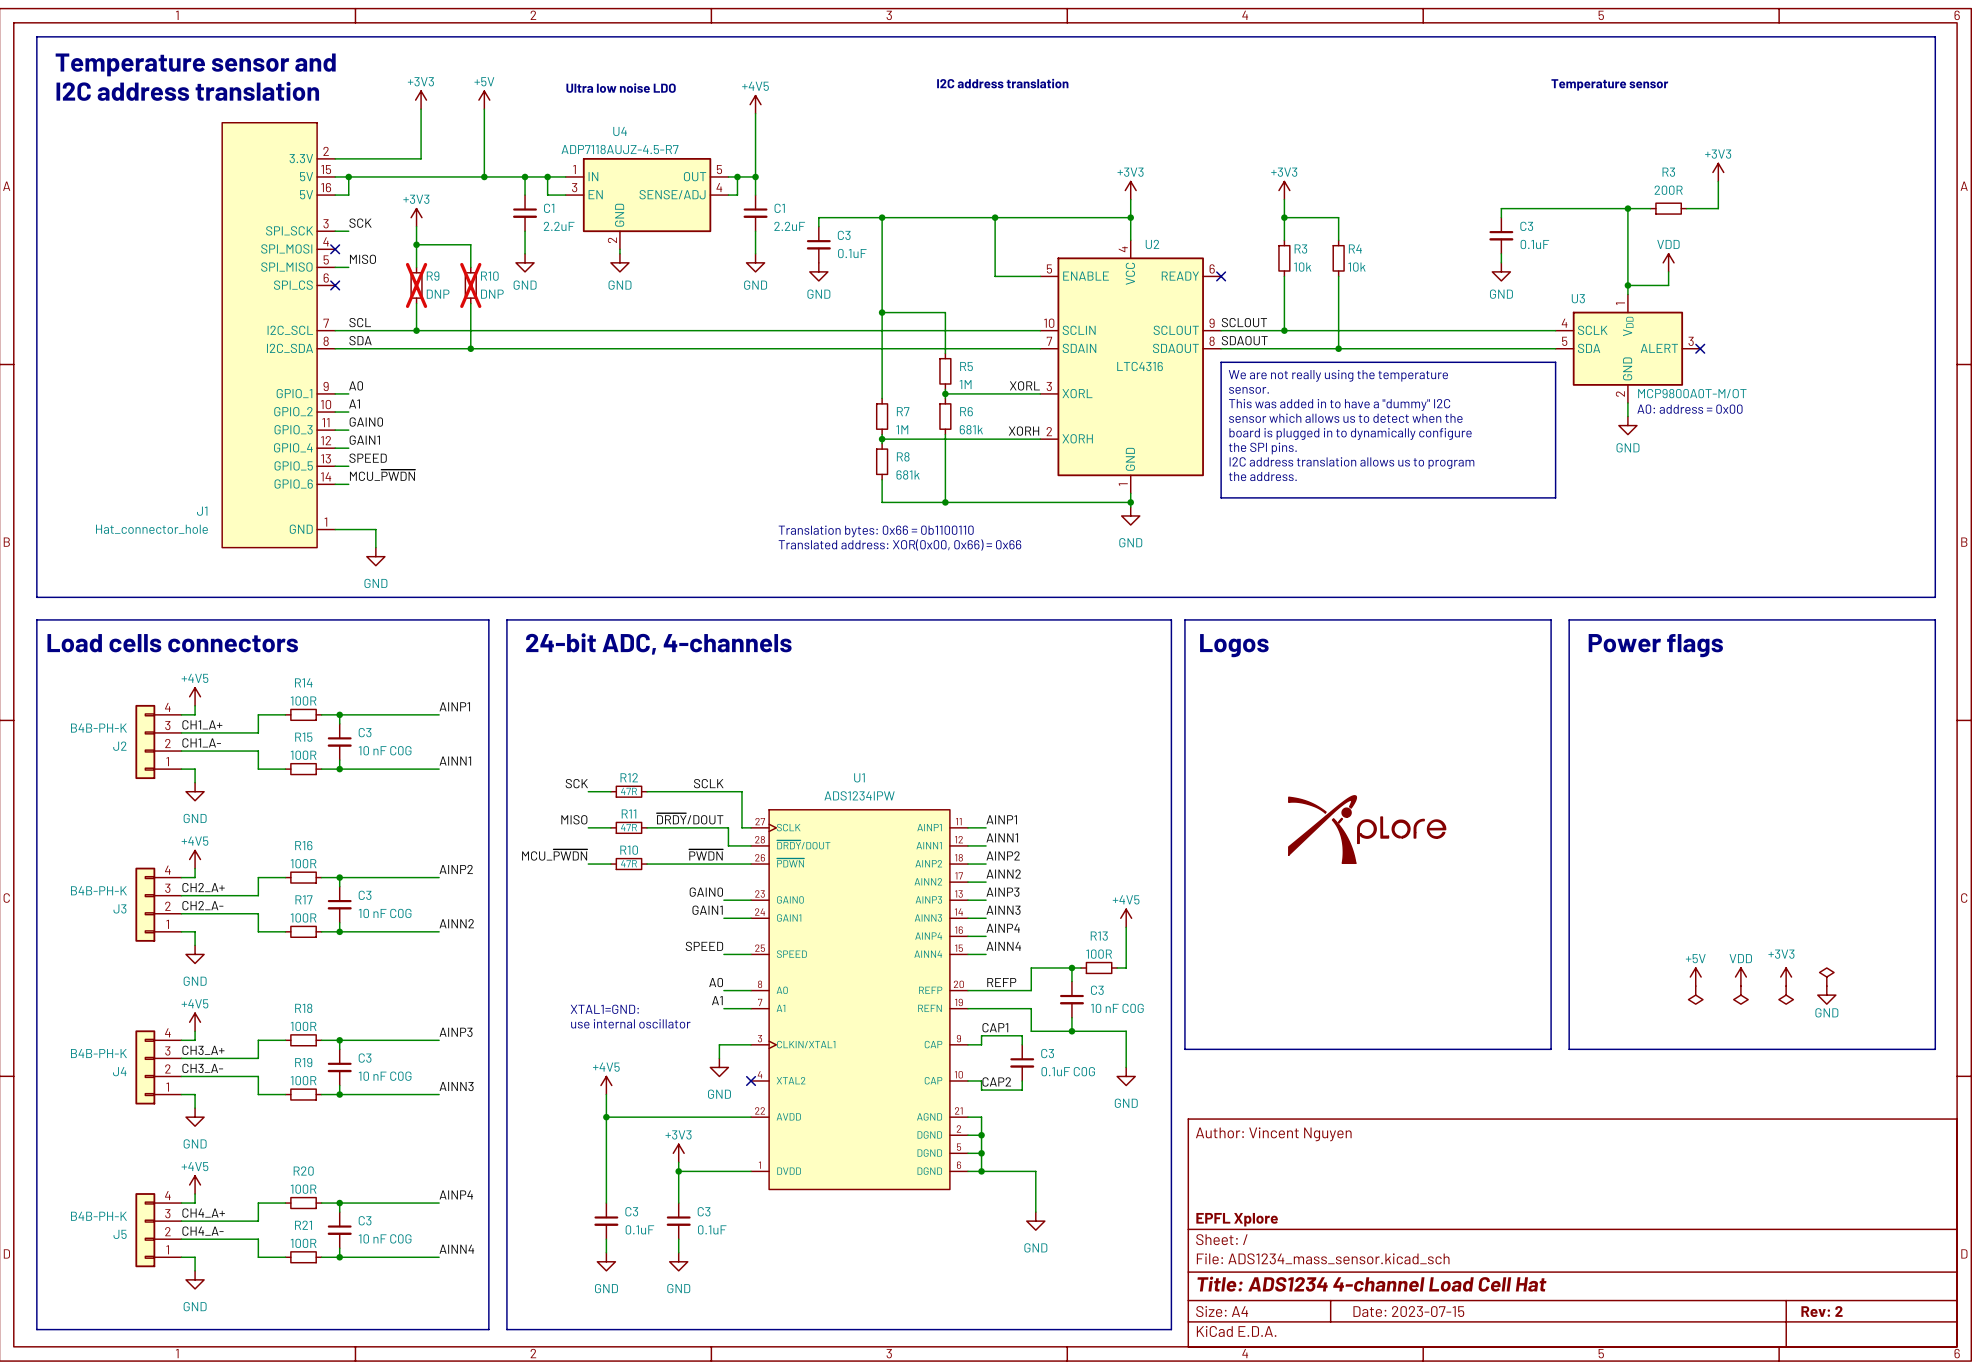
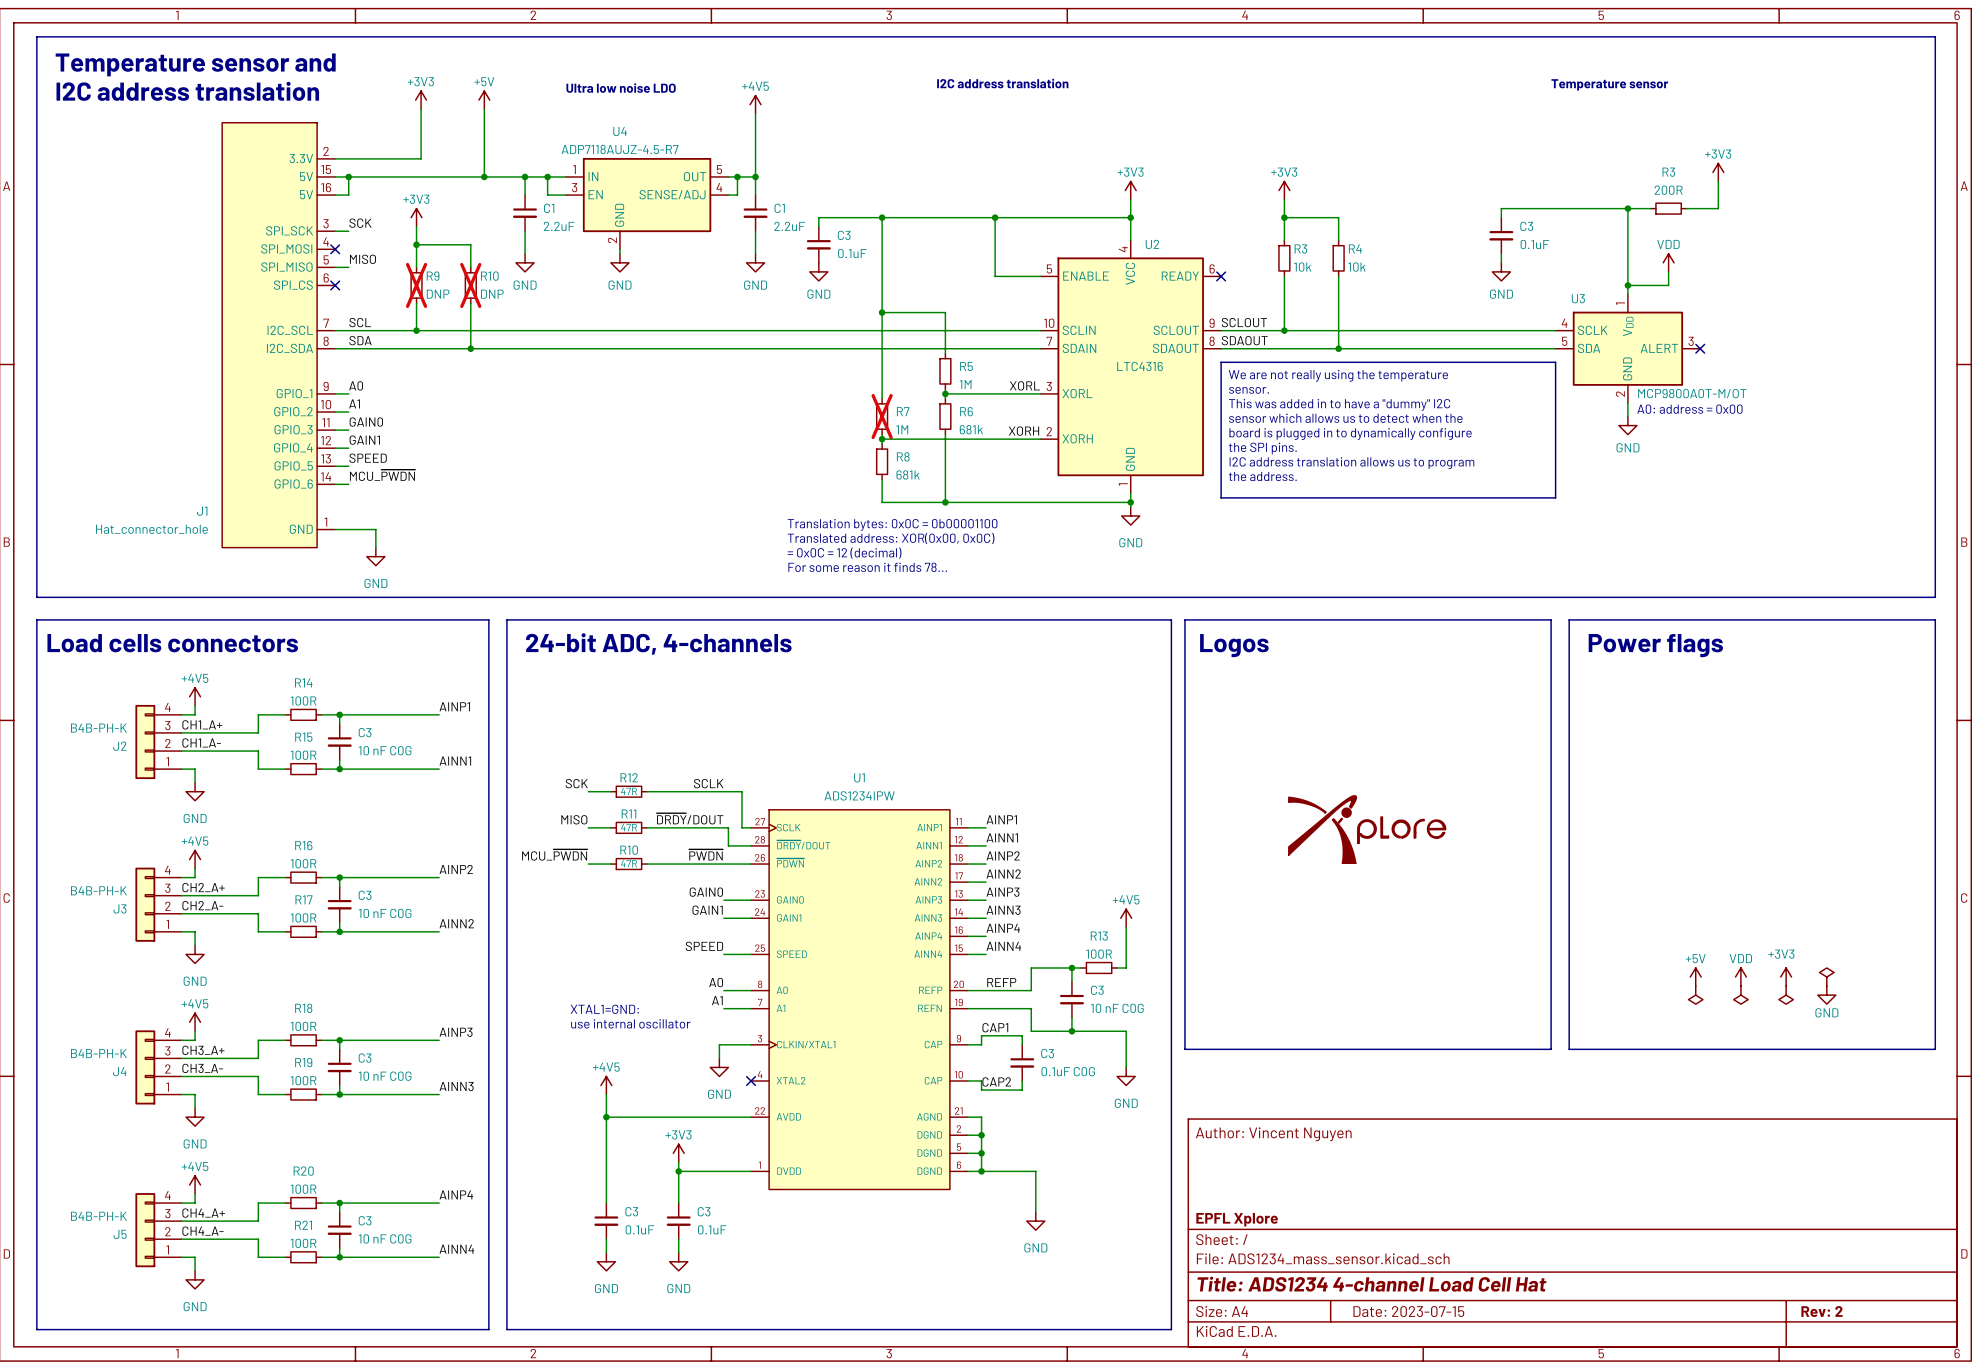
R7 do-not-place cross: none -> (882, 416)
text: Translation bytes: 0x66 = 0b1100110 (876, 531) -> Translation bytes: 0x0C = 0b00001100 (892, 524)
text: Translated address: XOR(0x00, 0x66) = 0x66 (899, 545) -> Translated address: XOR(0x00, 0x0C) (891, 538)
text: none -> = 0x0C = 12 (decimal) (844, 553)
text: none -> For some reason it finds 78... (867, 567)

